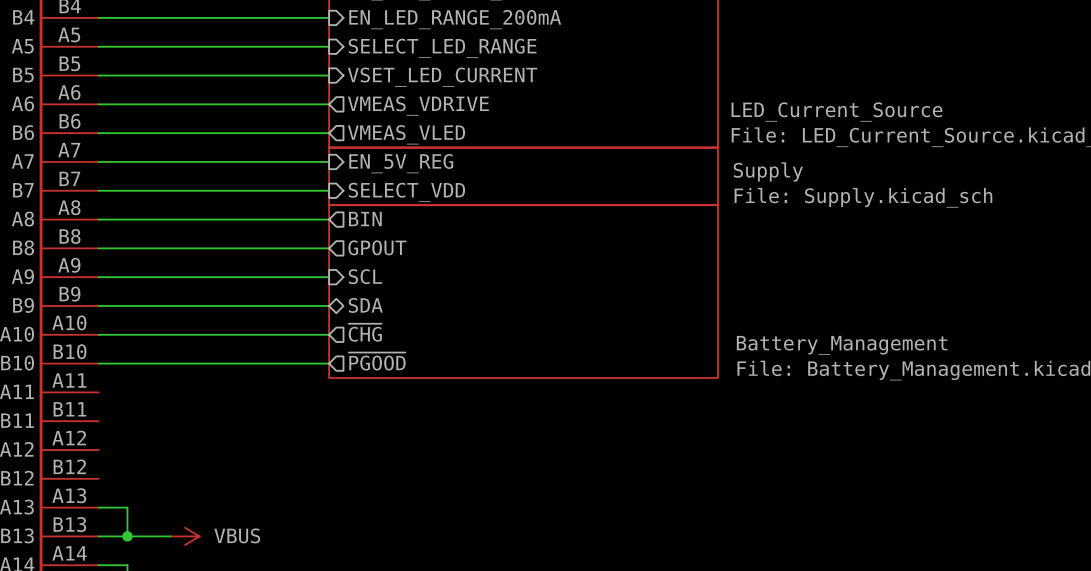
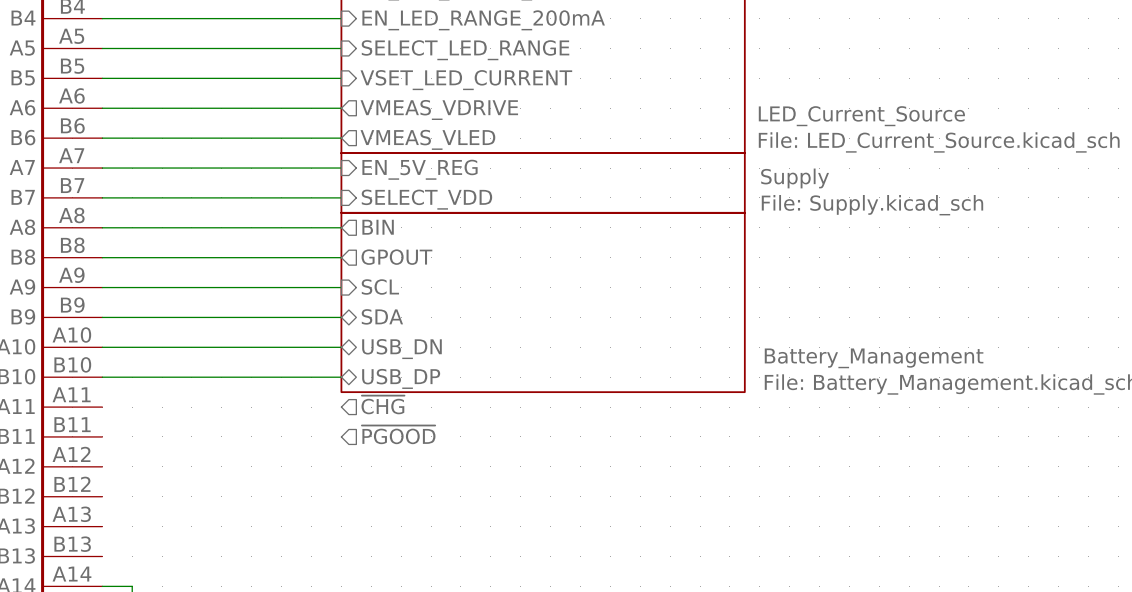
sheet pin shape: output (365, 332) -> bidirectional (401, 349)
sheet pin: ~{CHG} (365, 332) -> USB_DN (401, 349)
sheet pin shape: output (377, 361) -> bidirectional (401, 378)
sheet pin: ~{PGOOD} (377, 361) -> USB_DP (401, 378)
sheet pin: none -> ~{CHG} (383, 404)
sheet pin: none -> ~{PGOOD} (398, 434)
wire: (98, 507) (127, 507) (127, 536) -> none
wire: (98, 536) (170, 536) -> none
junction: (127, 536) -> none
power symbol: VBUS (185, 536) -> none

